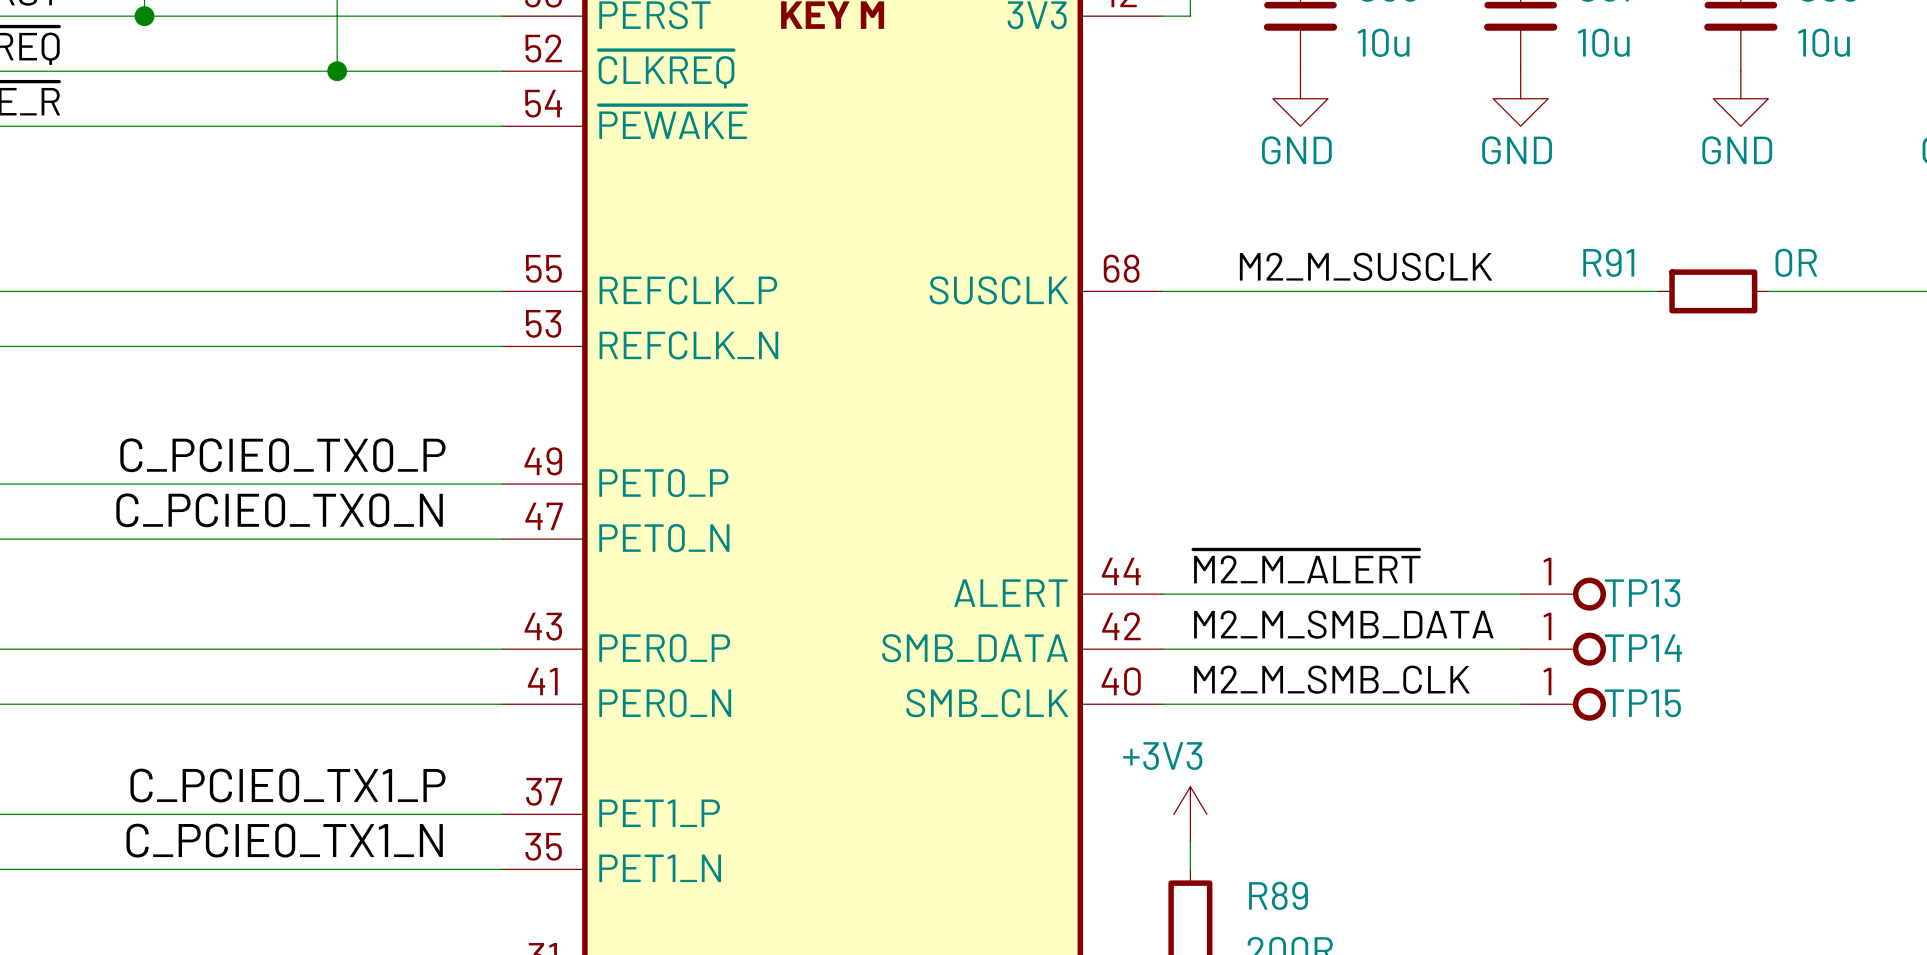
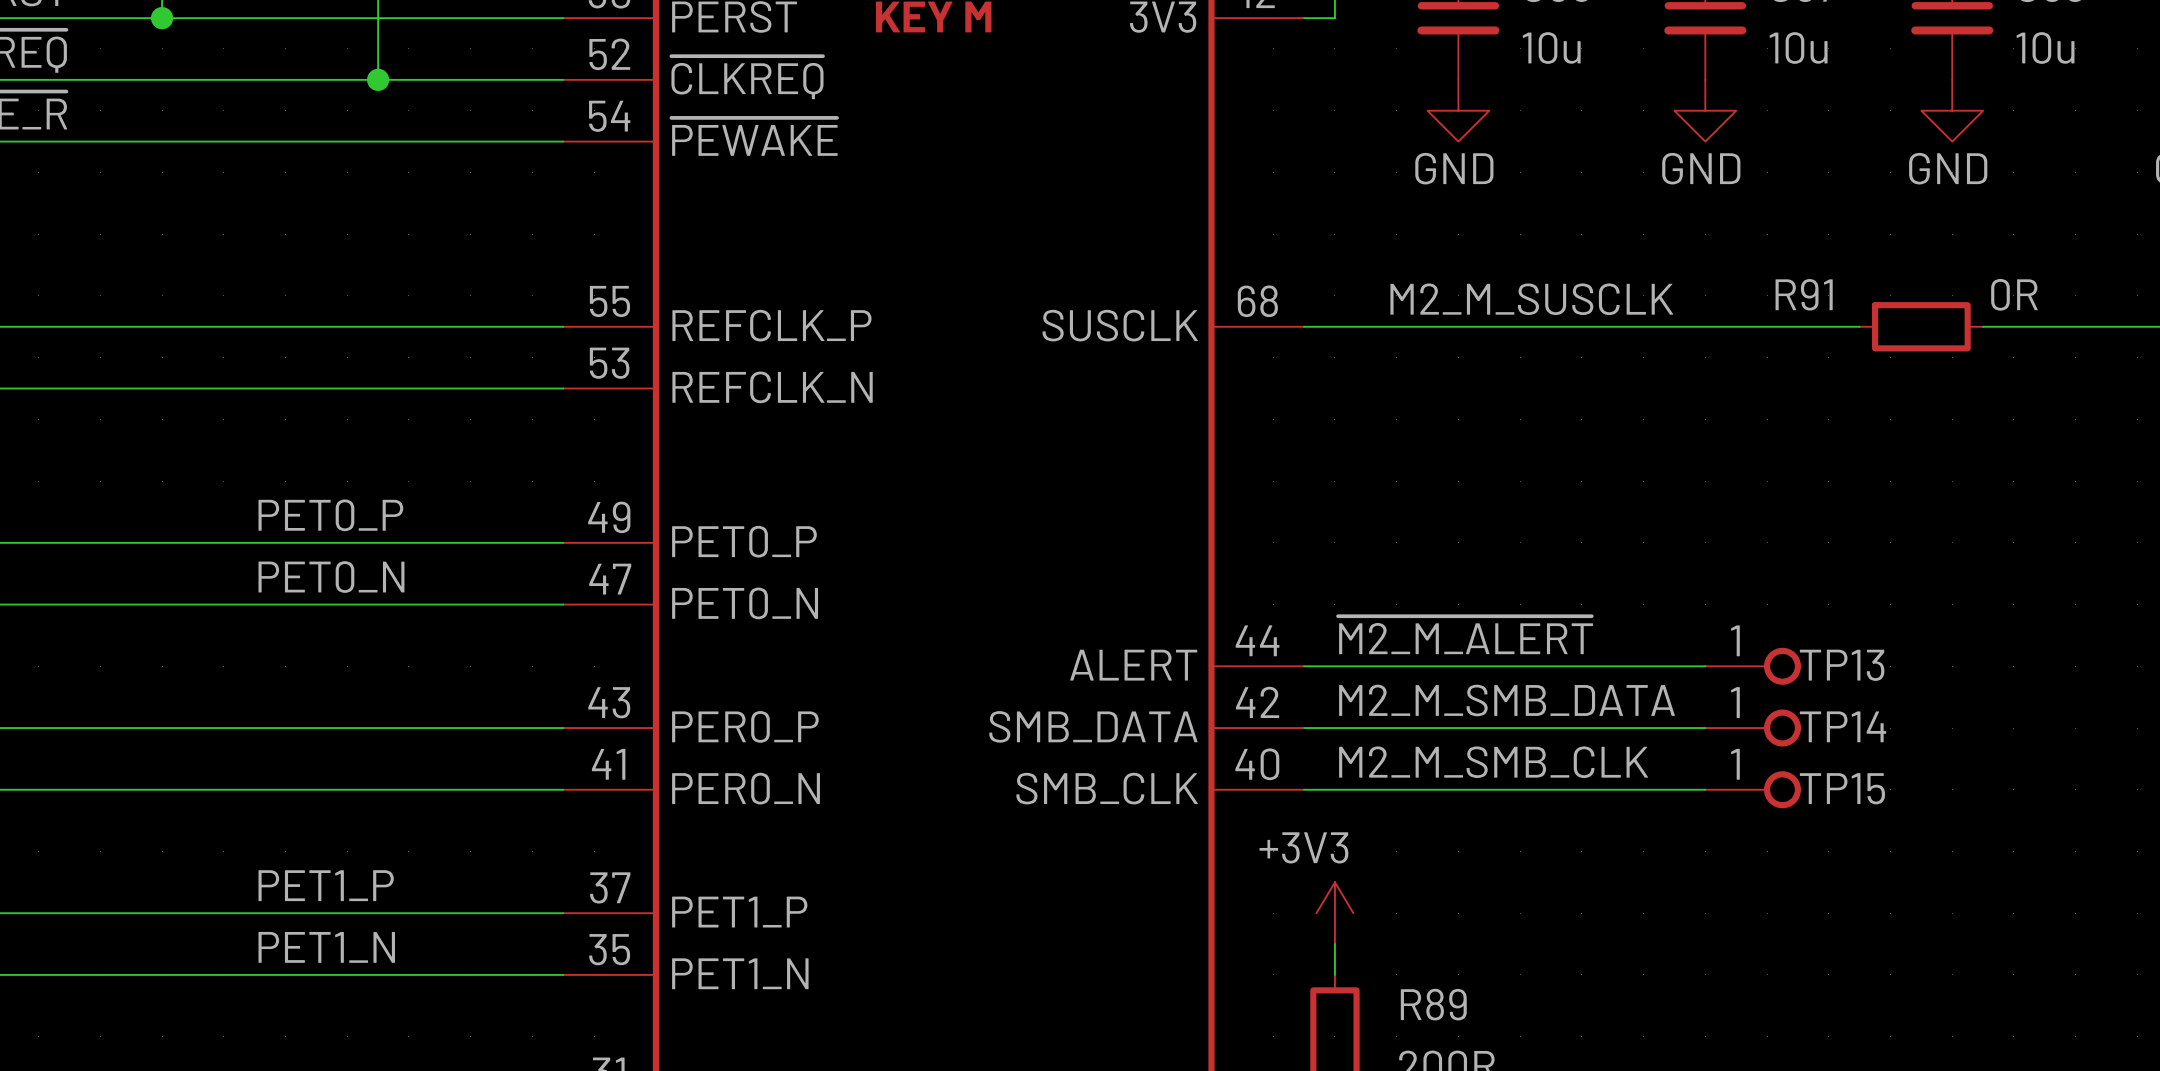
label: C_PCIE0_TX0_P (282, 455) -> PET0_P (330, 515)
label: C_PCIE0_TX0_N (279, 510) -> PET0_N (331, 577)
label: C_PCIE0_TX1_P (287, 785) -> PET1_P (326, 885)
label: C_PCIE0_TX1_N (284, 840) -> PET1_N (326, 947)

